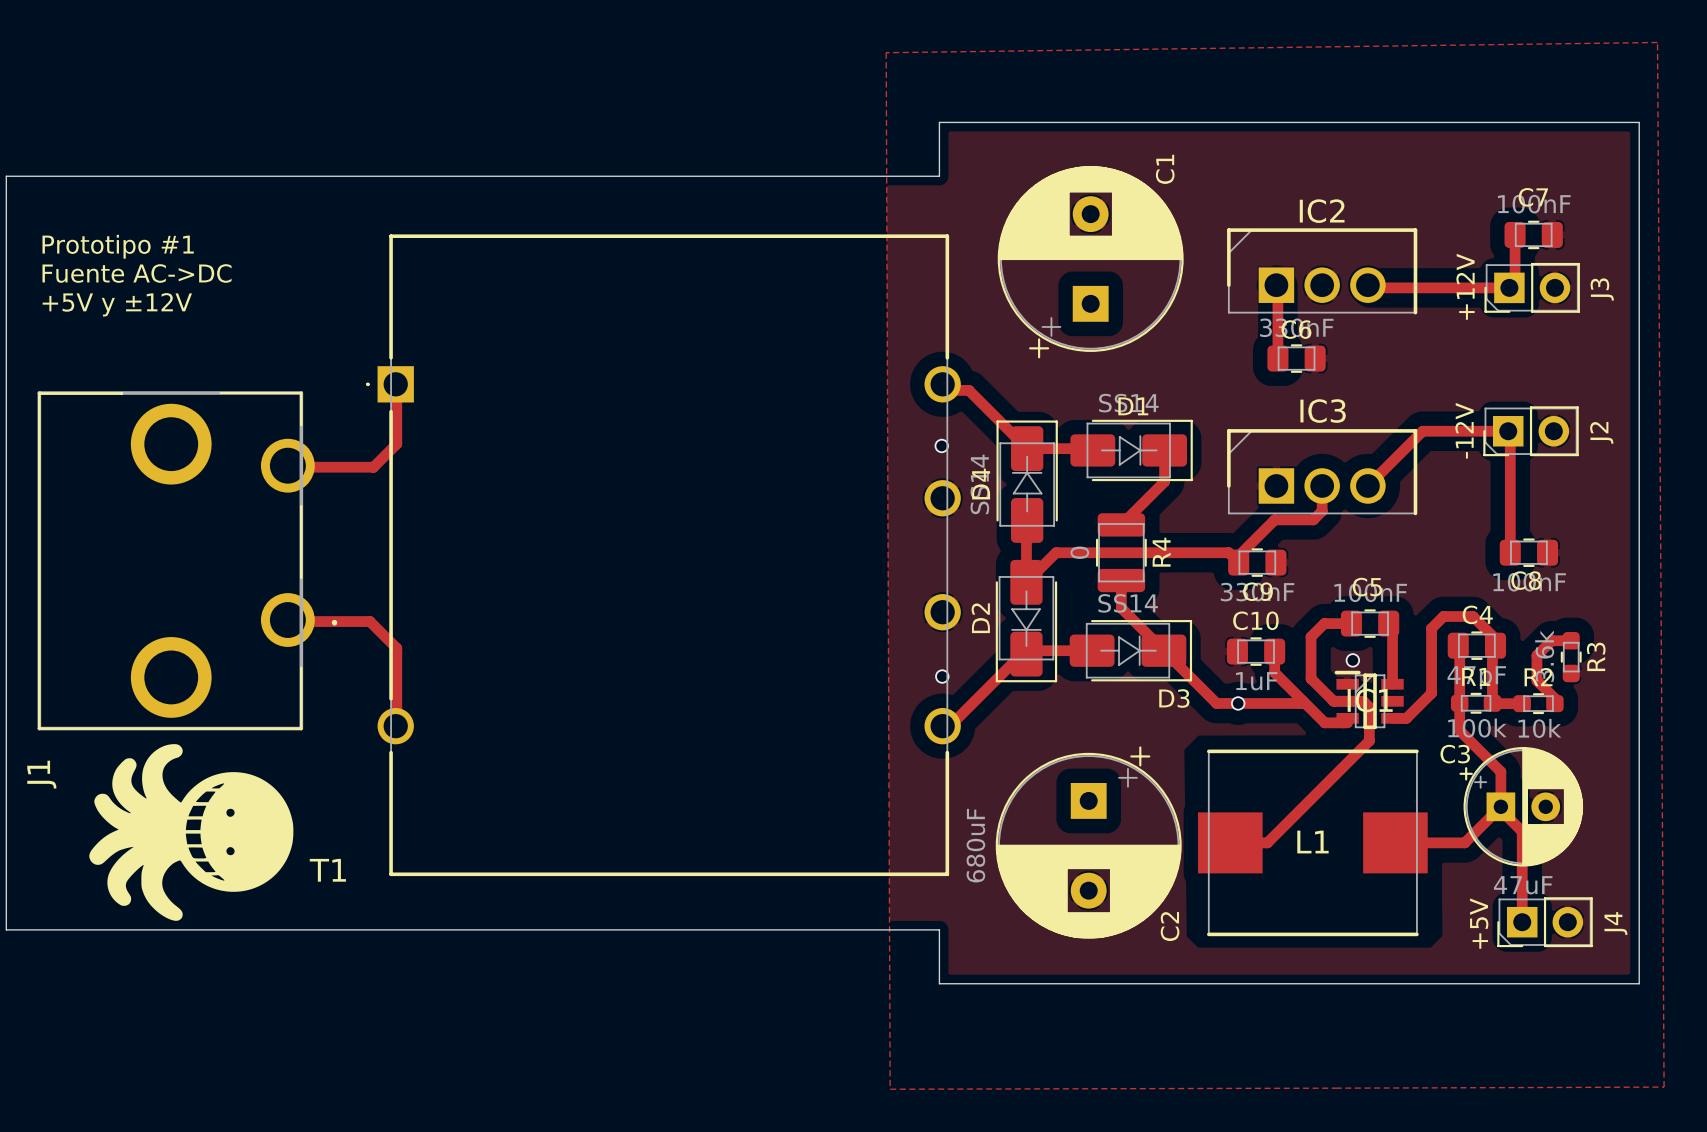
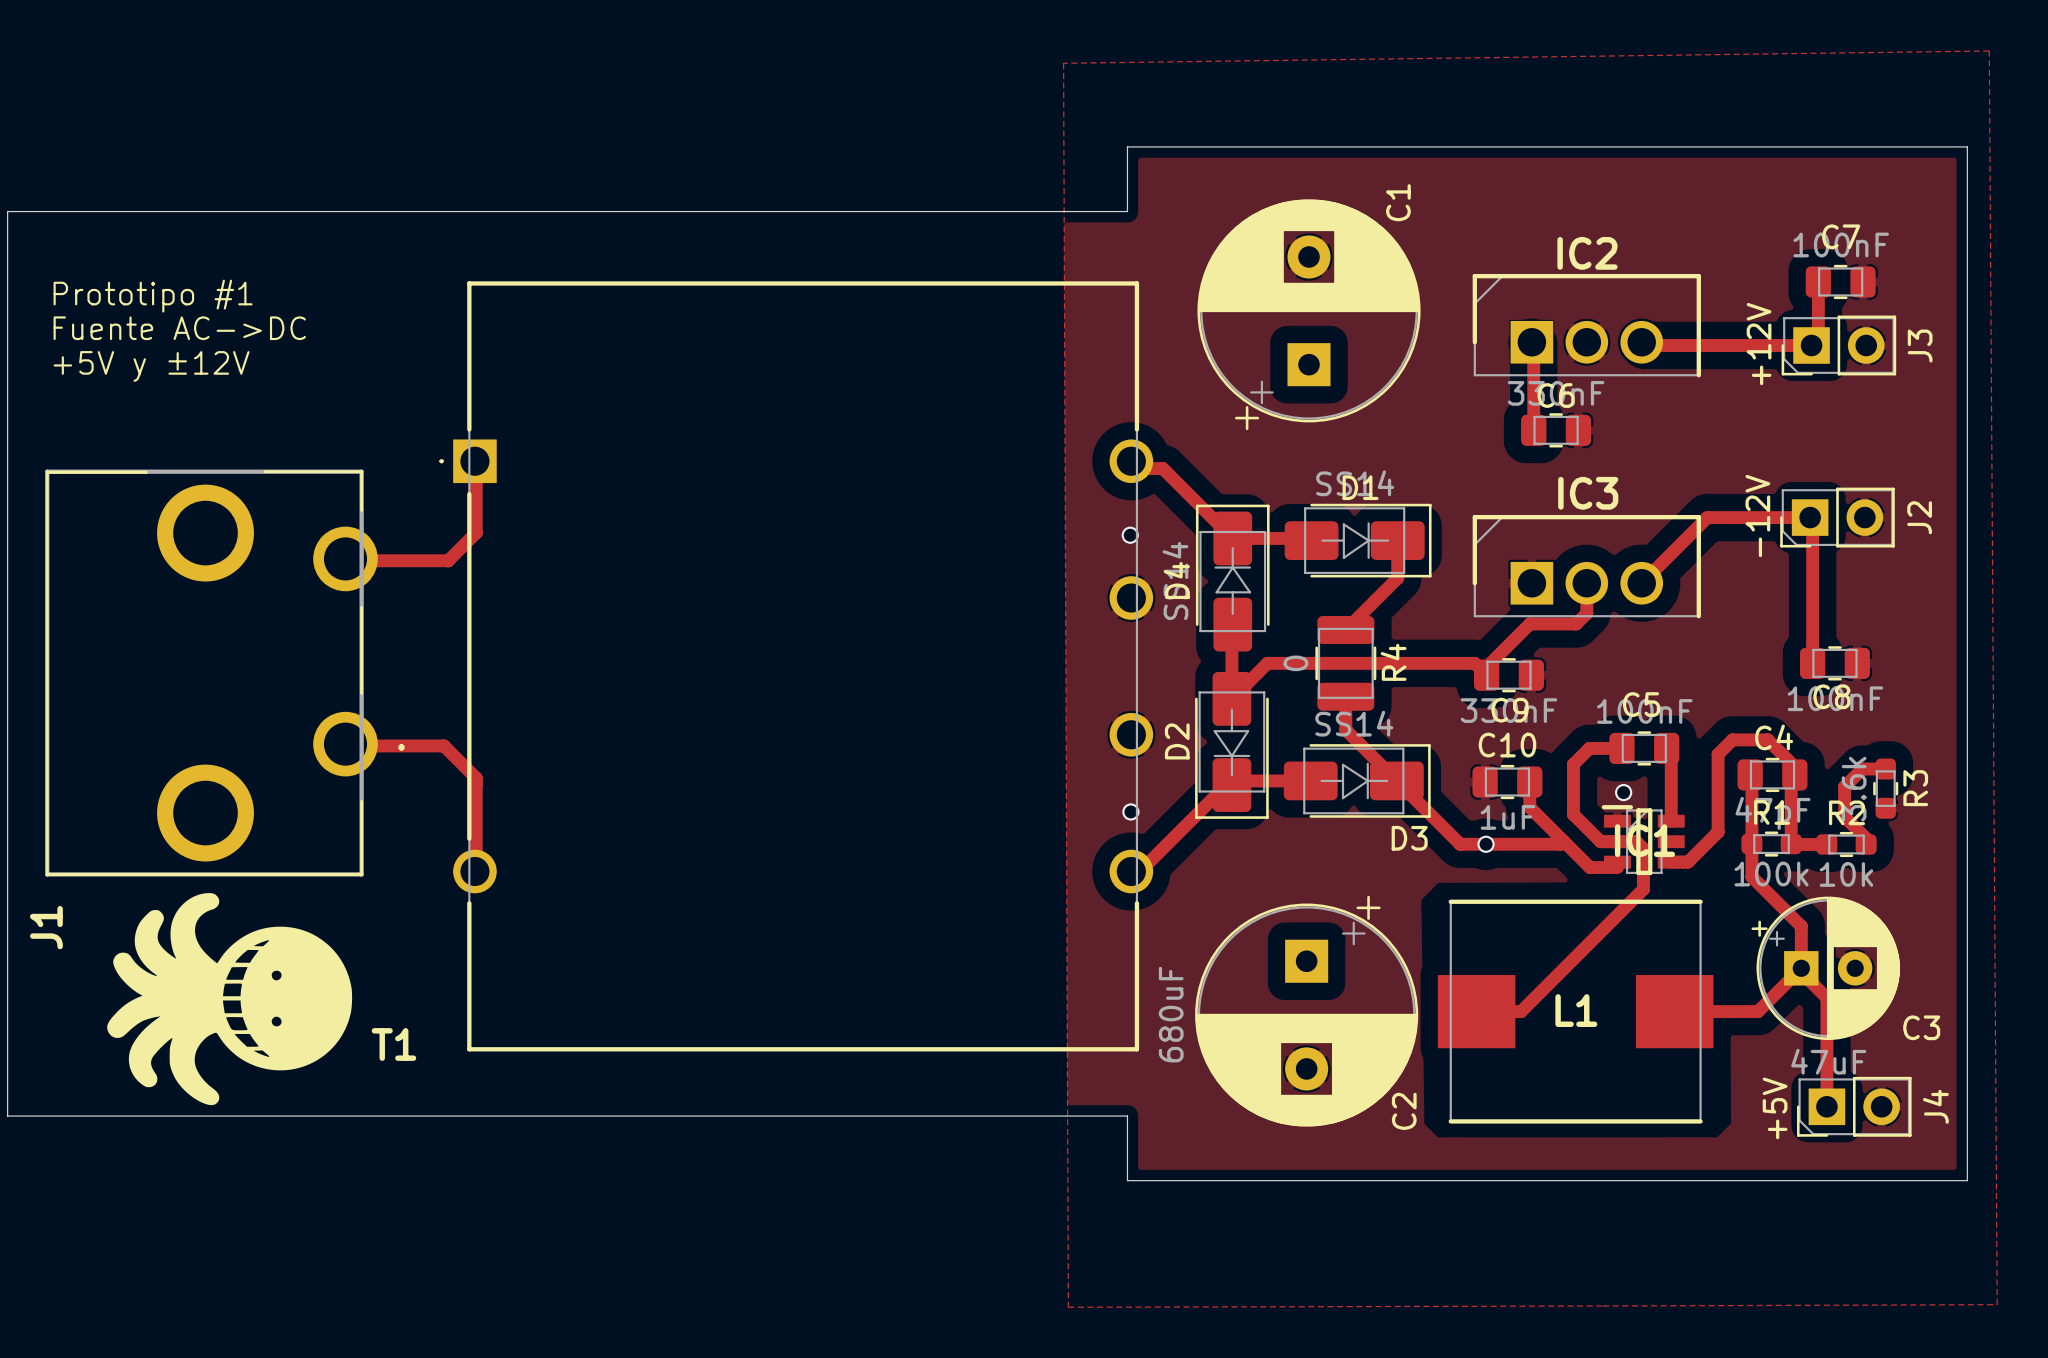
C3 name position: C3 (1455, 754) -> C3 (1921, 1027)

